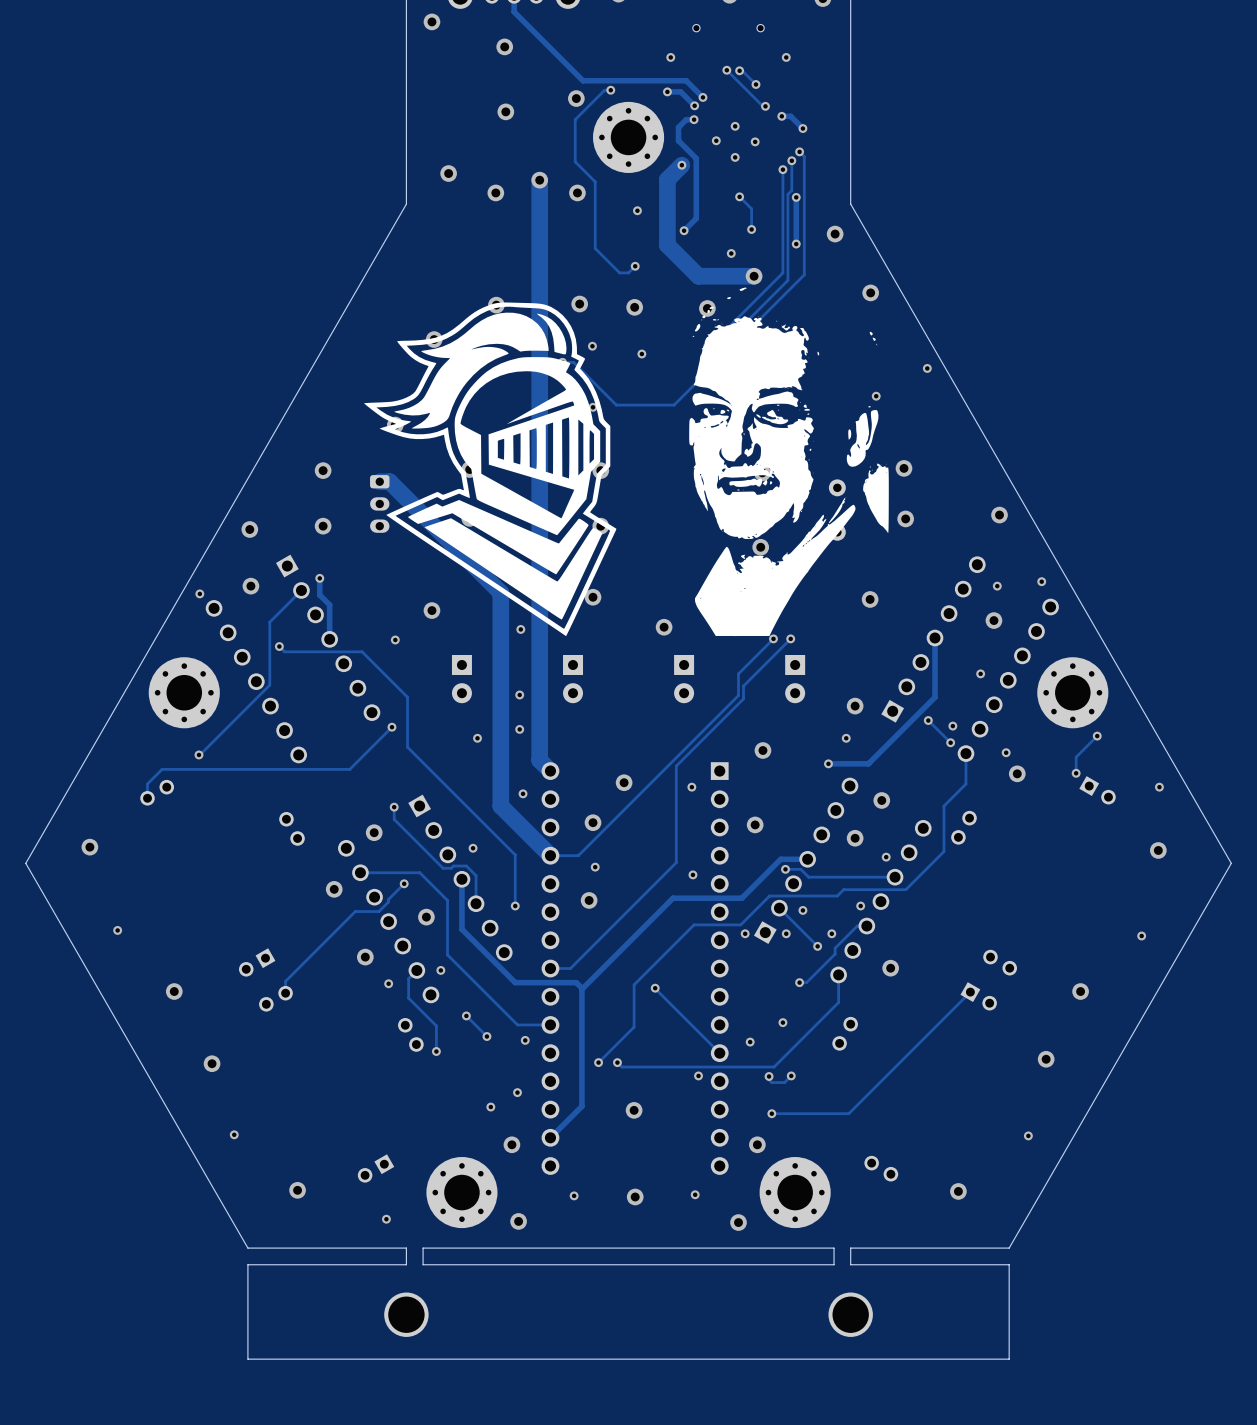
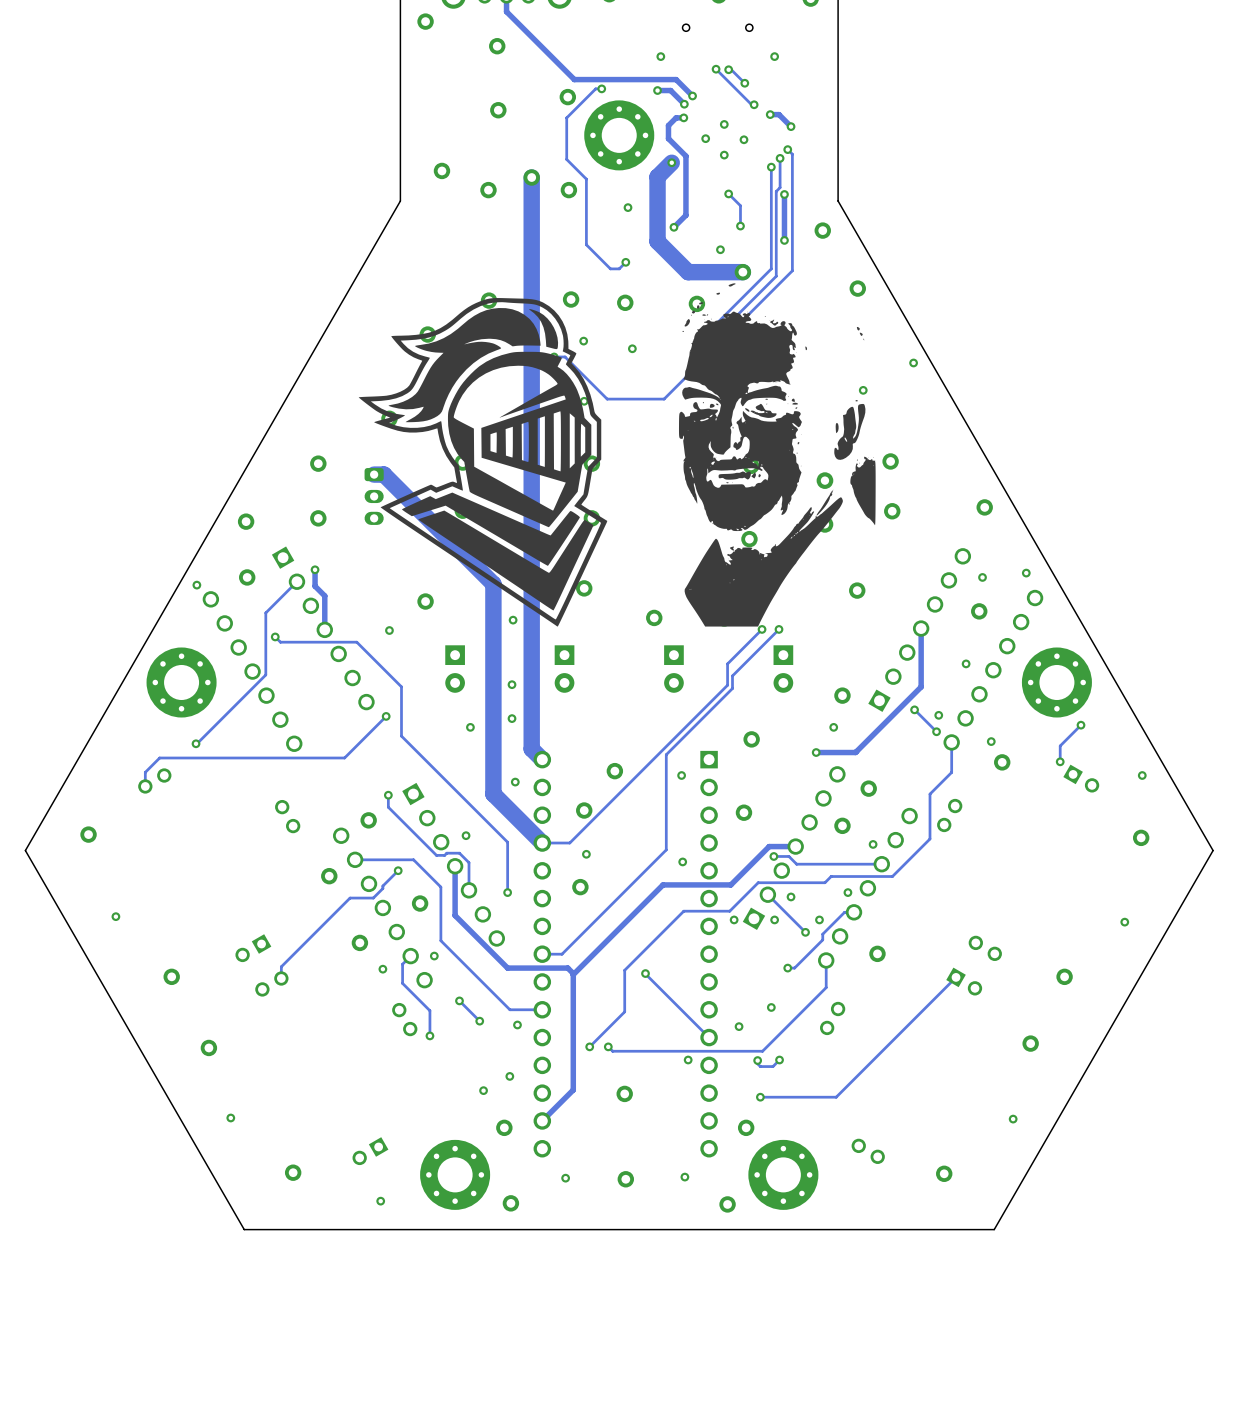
board edge: (834, 1248) (834, 1264) (423, 1264) (423, 1248) -> (400, 1229) (416, 1229)
board edge: (850, 1248) (850, 1264) (1009, 1264) (1009, 1359) (247, 1359) (247, 1264) (406, 1264) (406, 1248) -> (838, 1229) (821, 1229)
part: (406, 1314) -> none
part: (850, 1314) -> none

